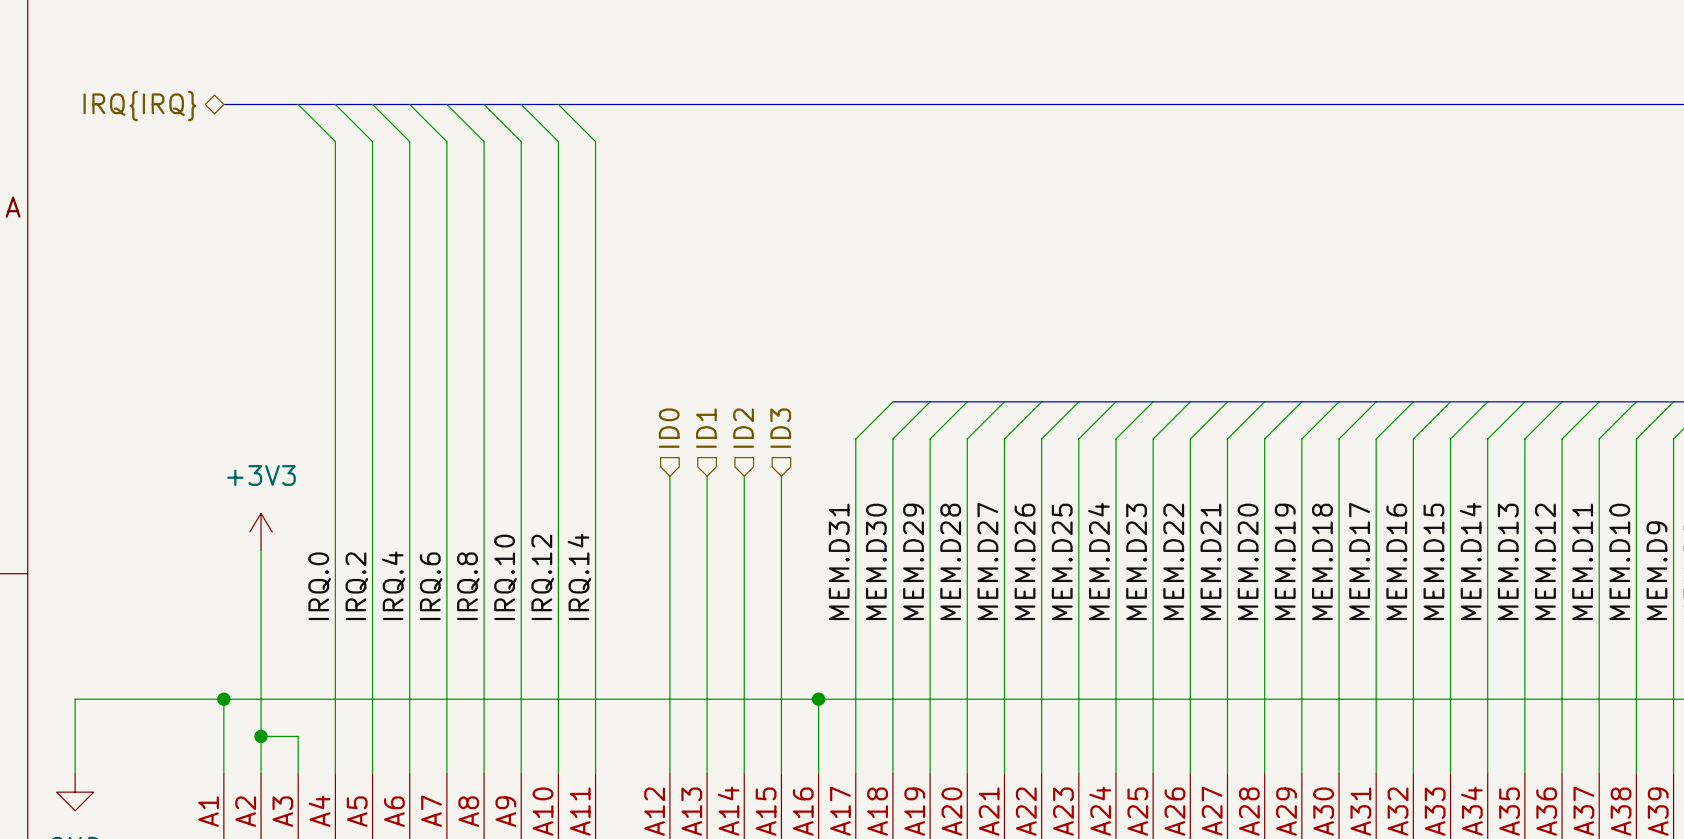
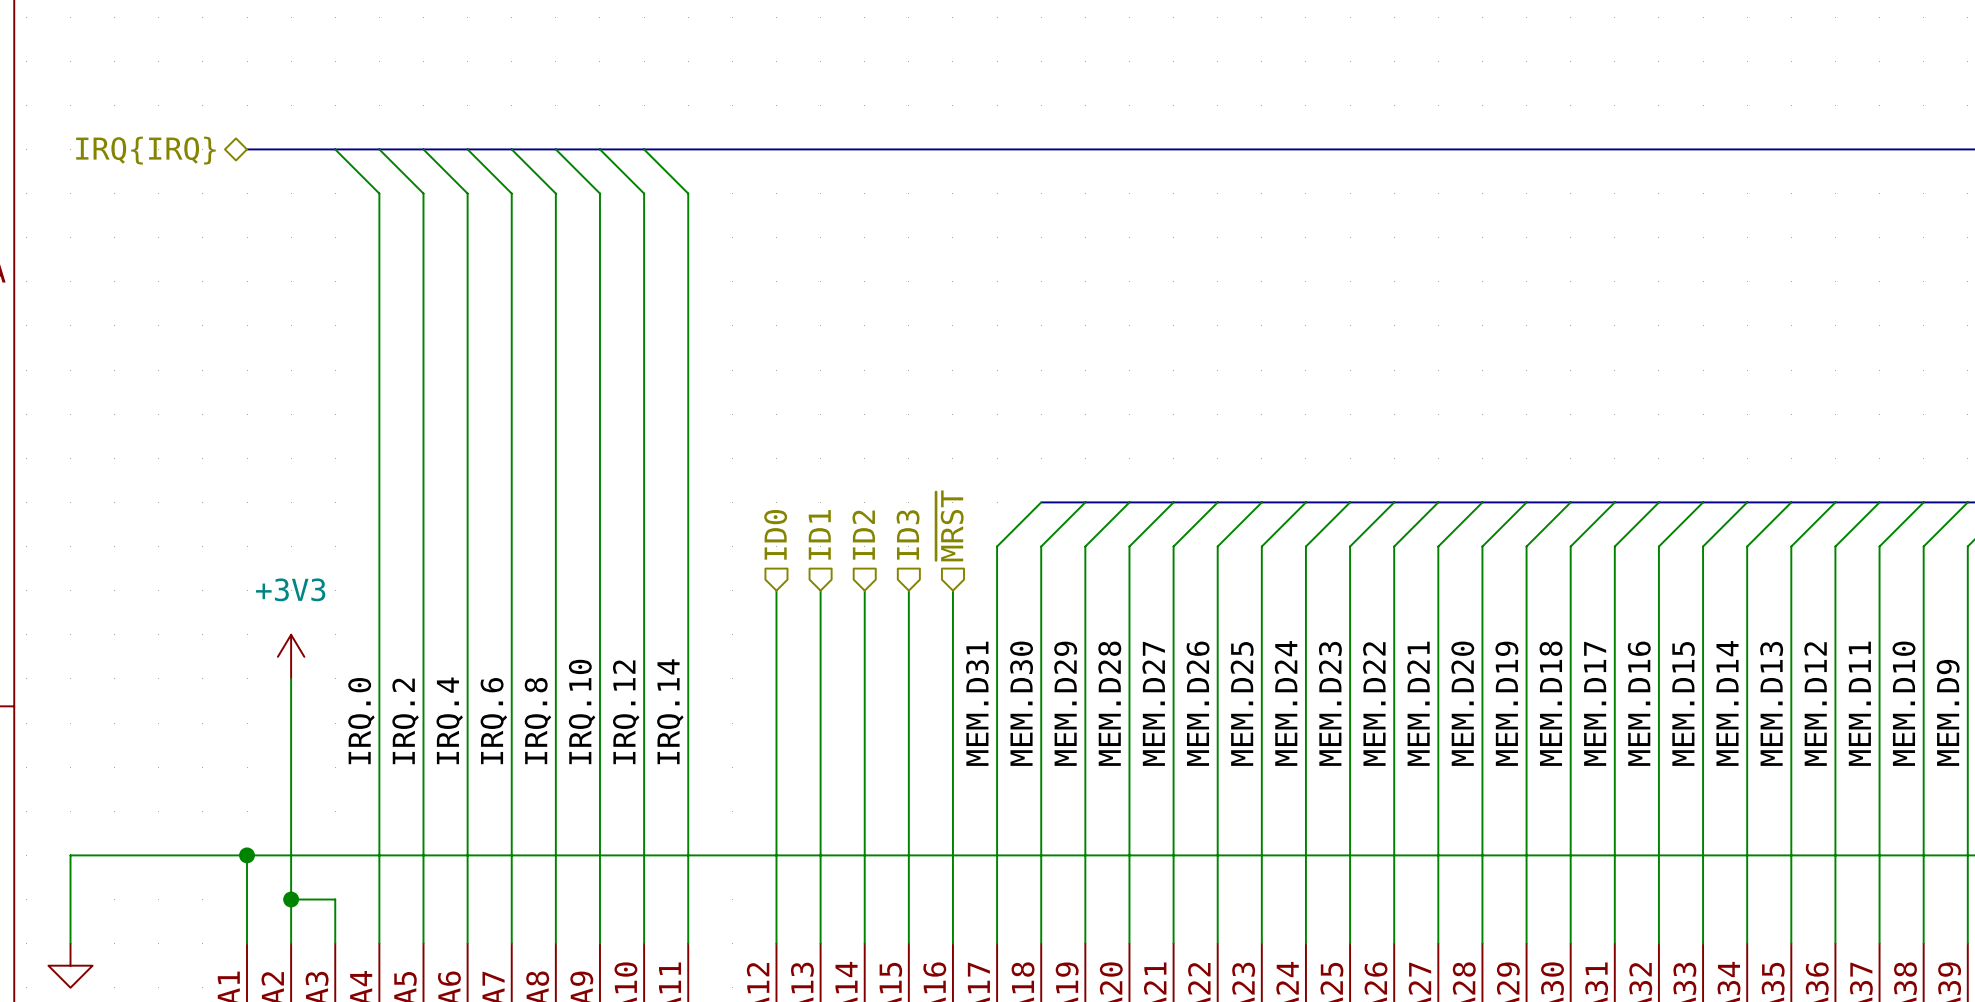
hierarchical label: none -> ~{MRST} (949, 525)
wire: none -> (952, 590) (952, 855)
junction: (818, 699) -> none

